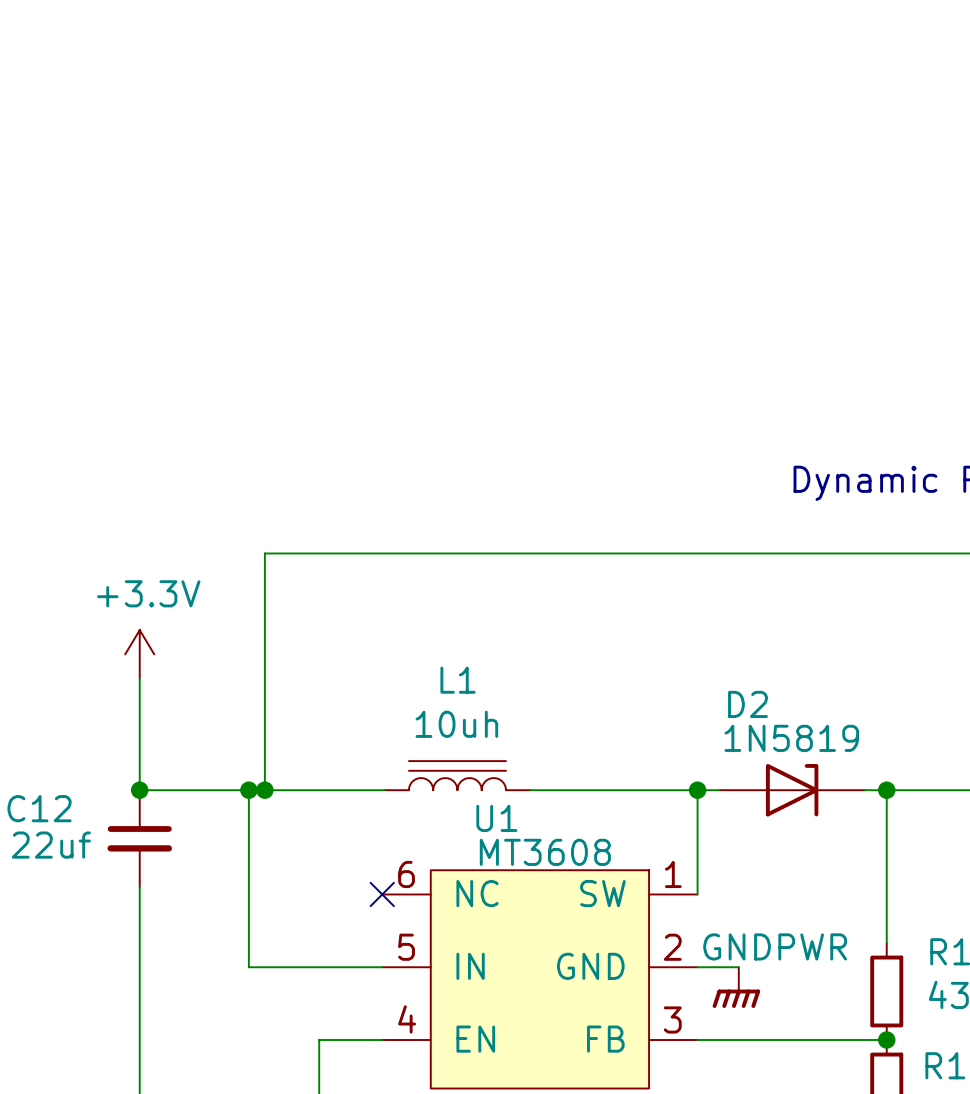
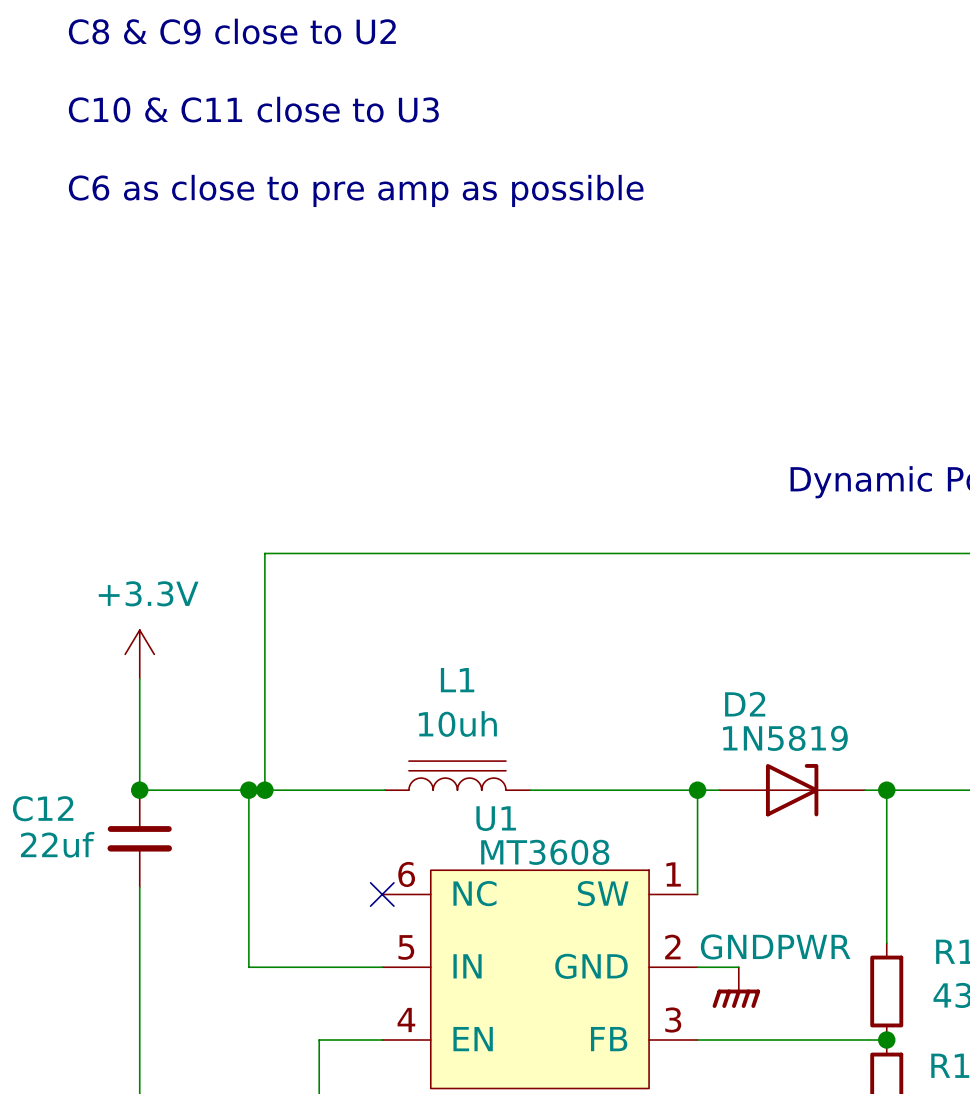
text: none -> C8 & C9 close to U2 (232, 31)
text: none -> C10 & C11 close to U3 (253, 109)
text: none -> C6 as close to pre amp as possible (356, 190)

